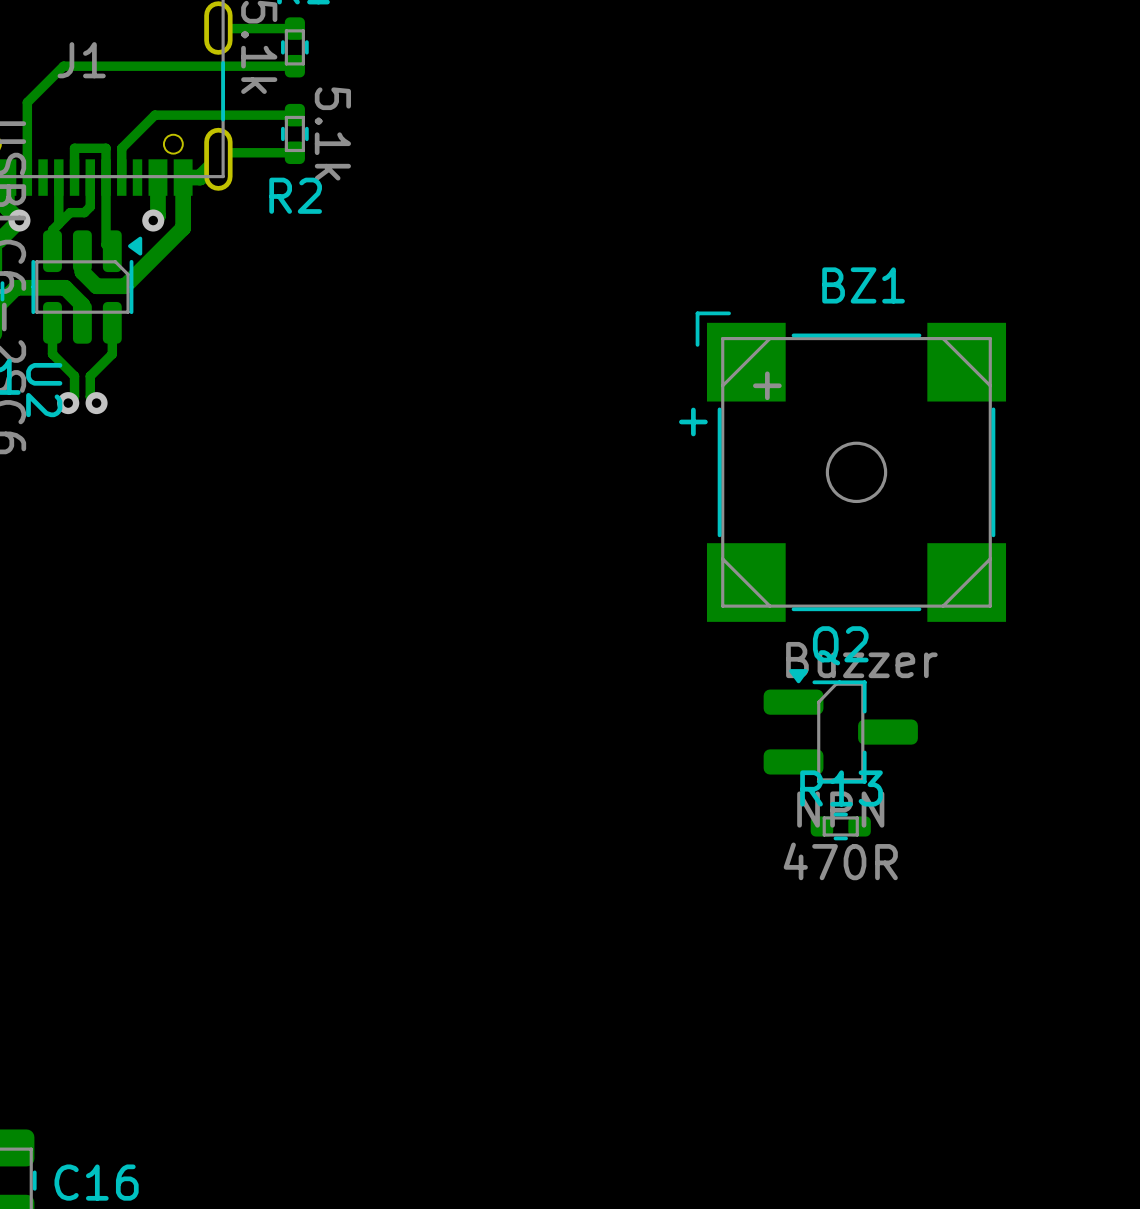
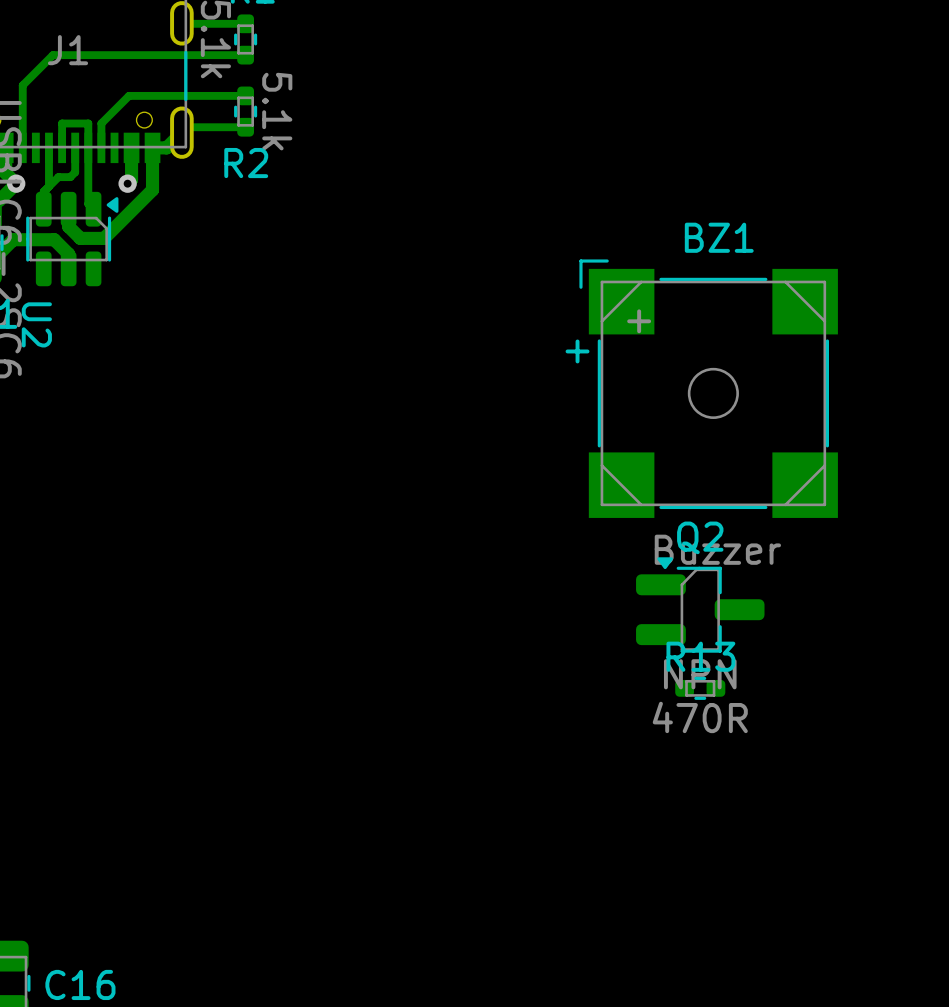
track: (52, 322) (52, 354) (74, 376) (74, 396) (68, 403) -> none
track: (112, 322) (112, 354) (90, 376) (90, 396) (96, 403) -> none
via: (68, 403) -> none
via: (96, 403) -> none

